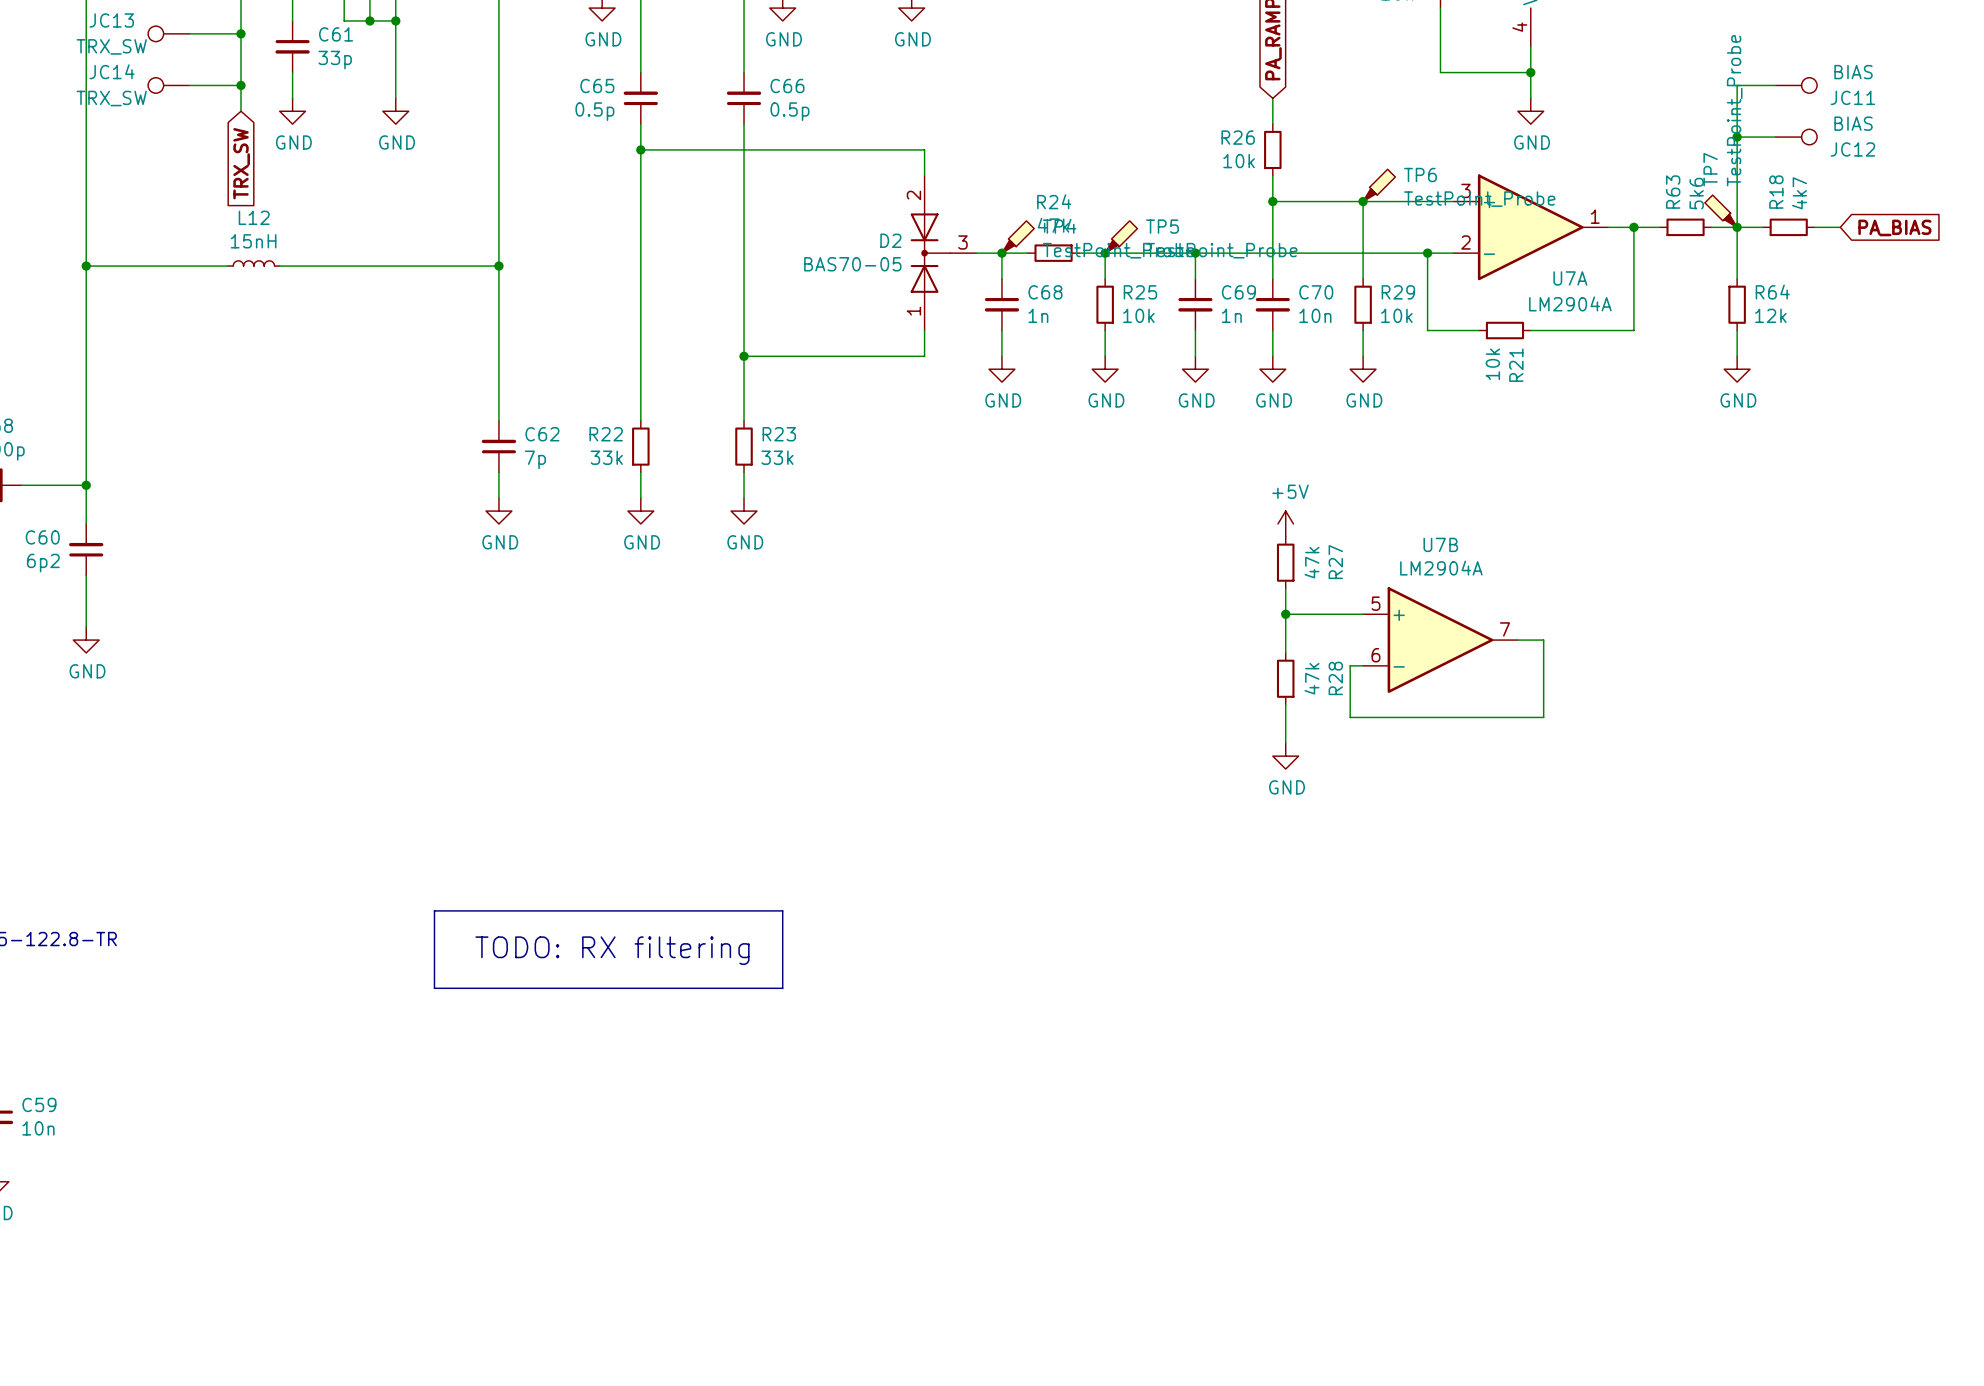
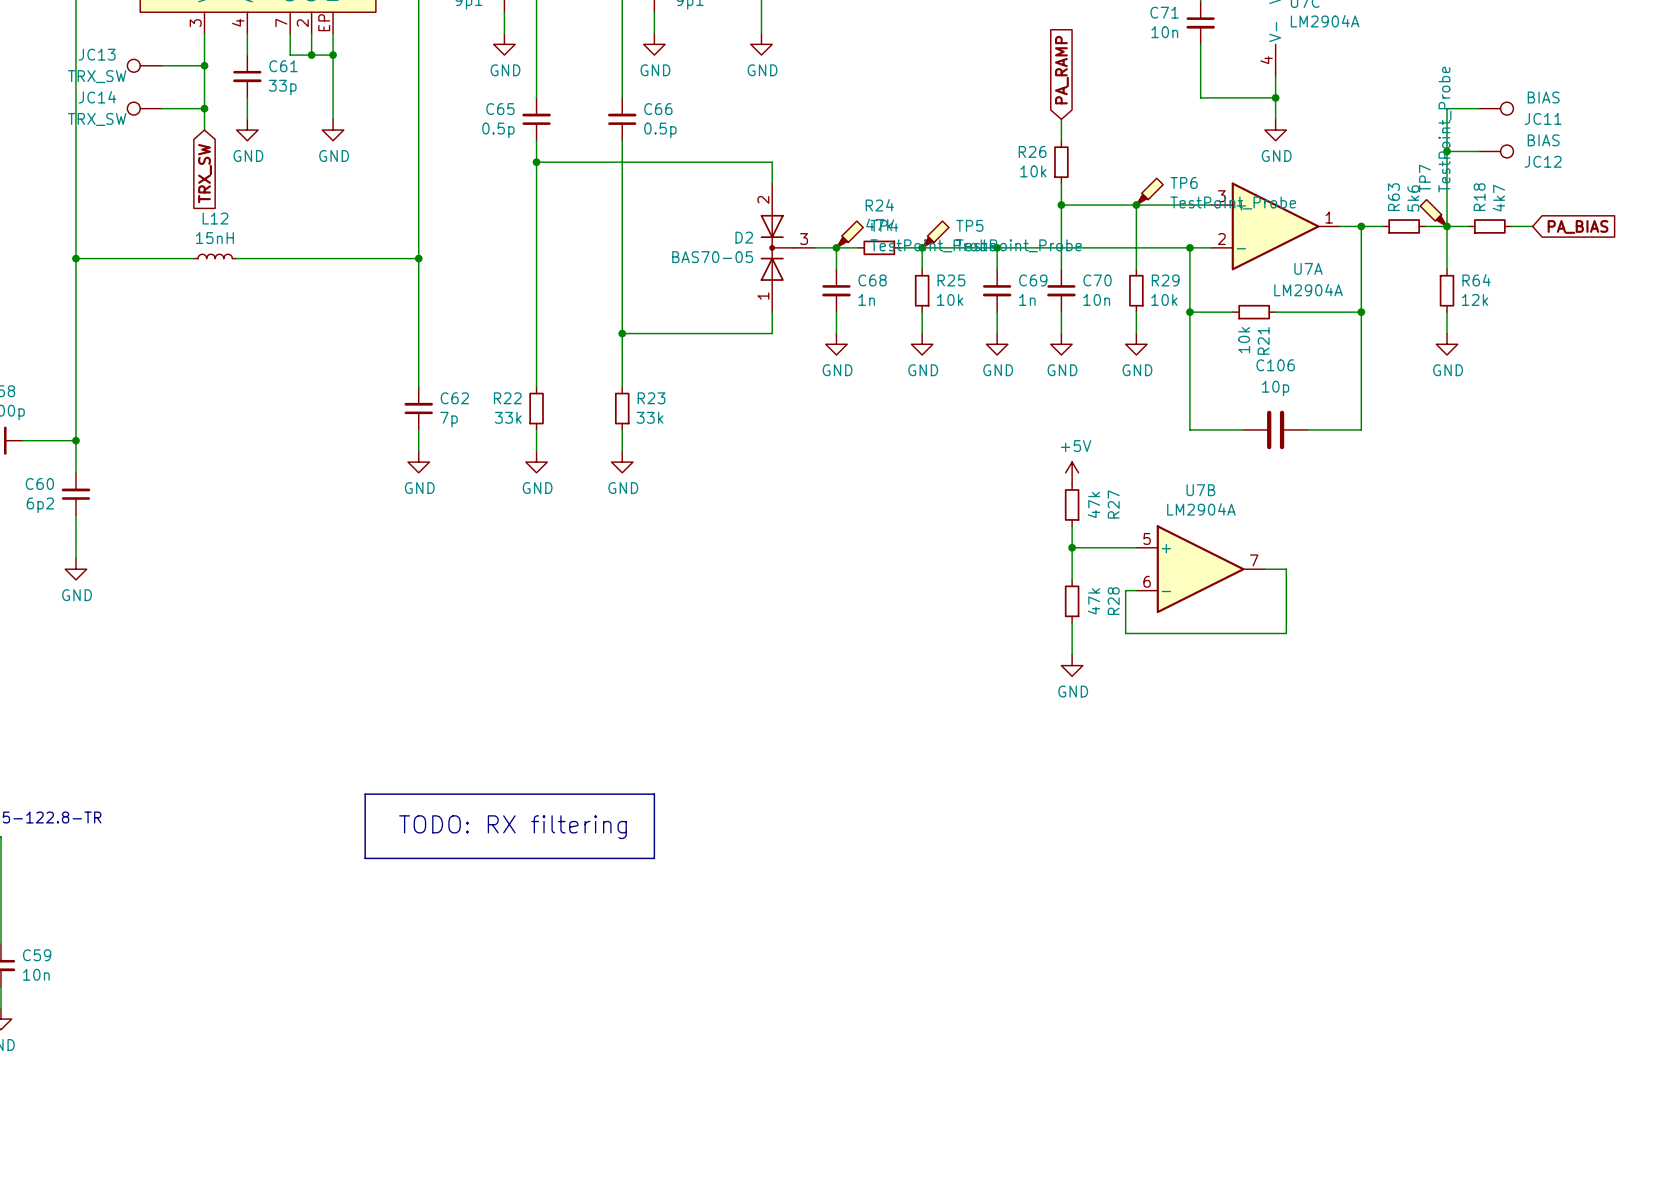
wire: none -> (1189, 312) (1189, 429) (1243, 429)
junction: none -> (1189, 312)
wire: none -> (1361, 312) (1361, 429) (1307, 429)
junction: none -> (1361, 312)
C106: none -> 10p (1275, 429)

